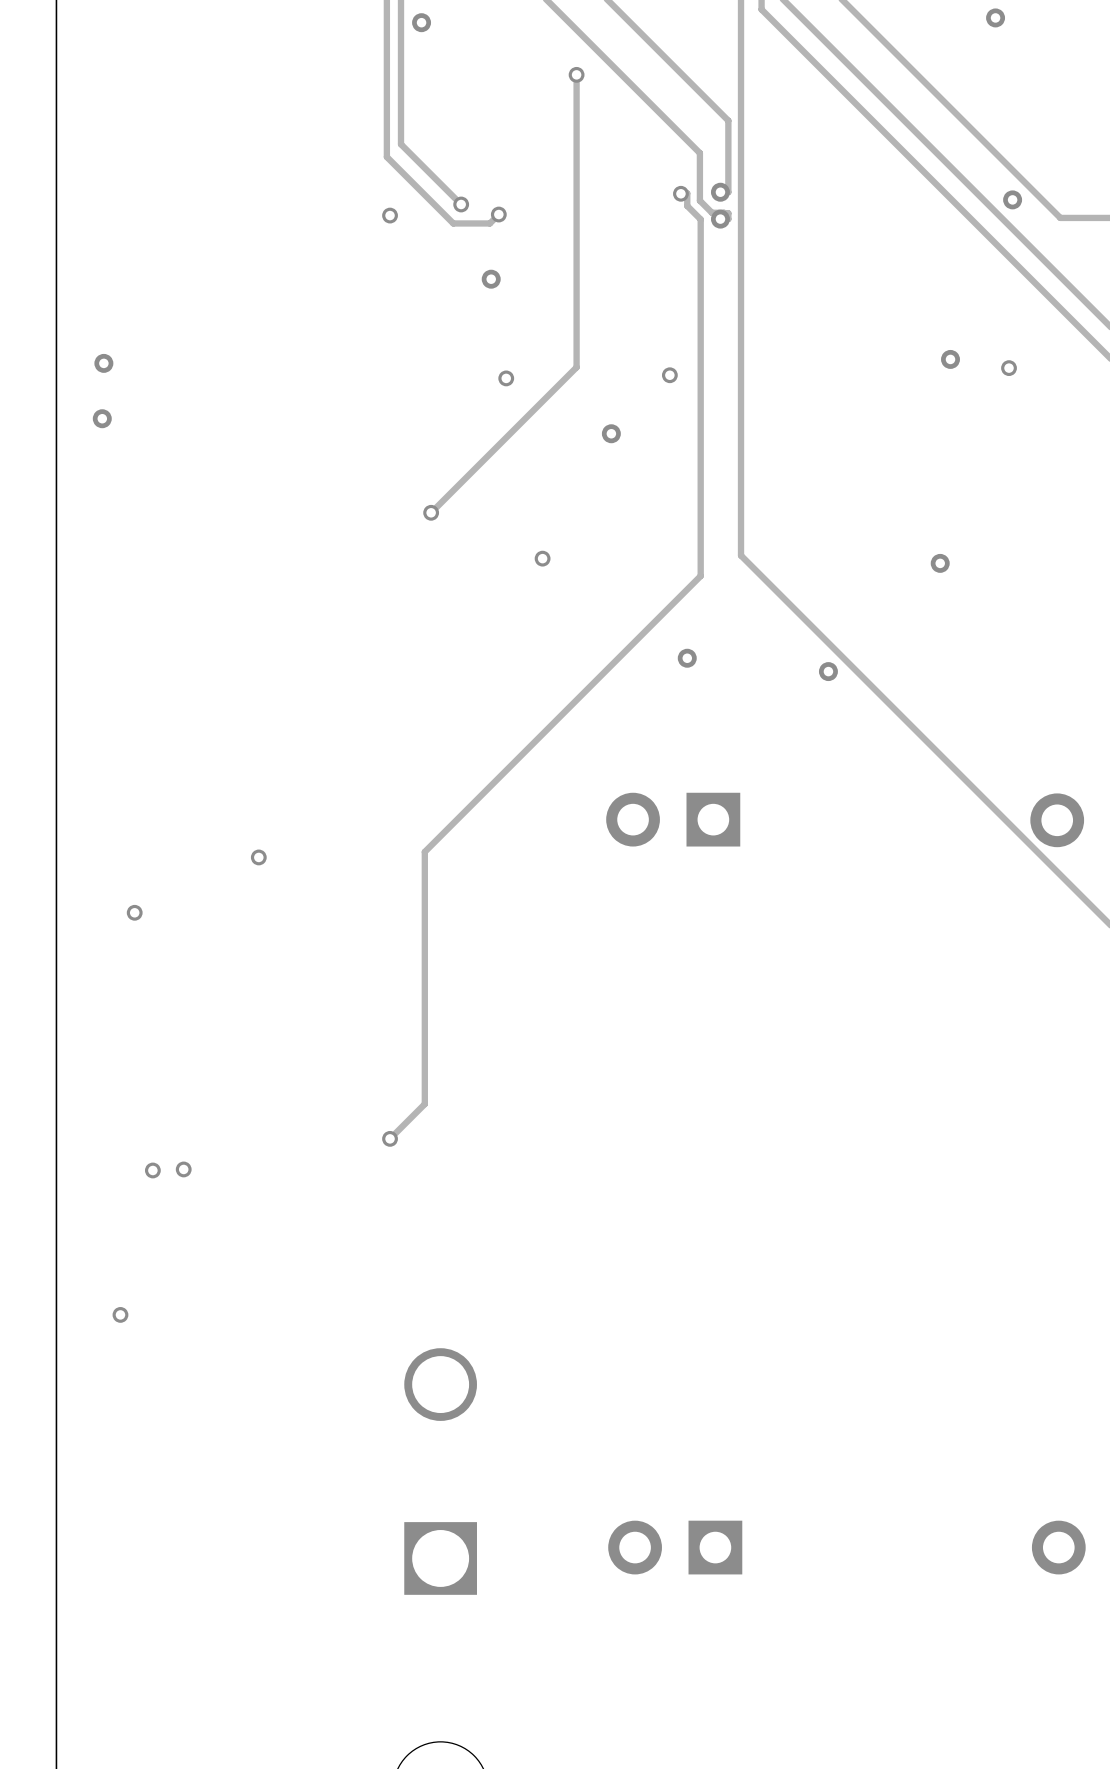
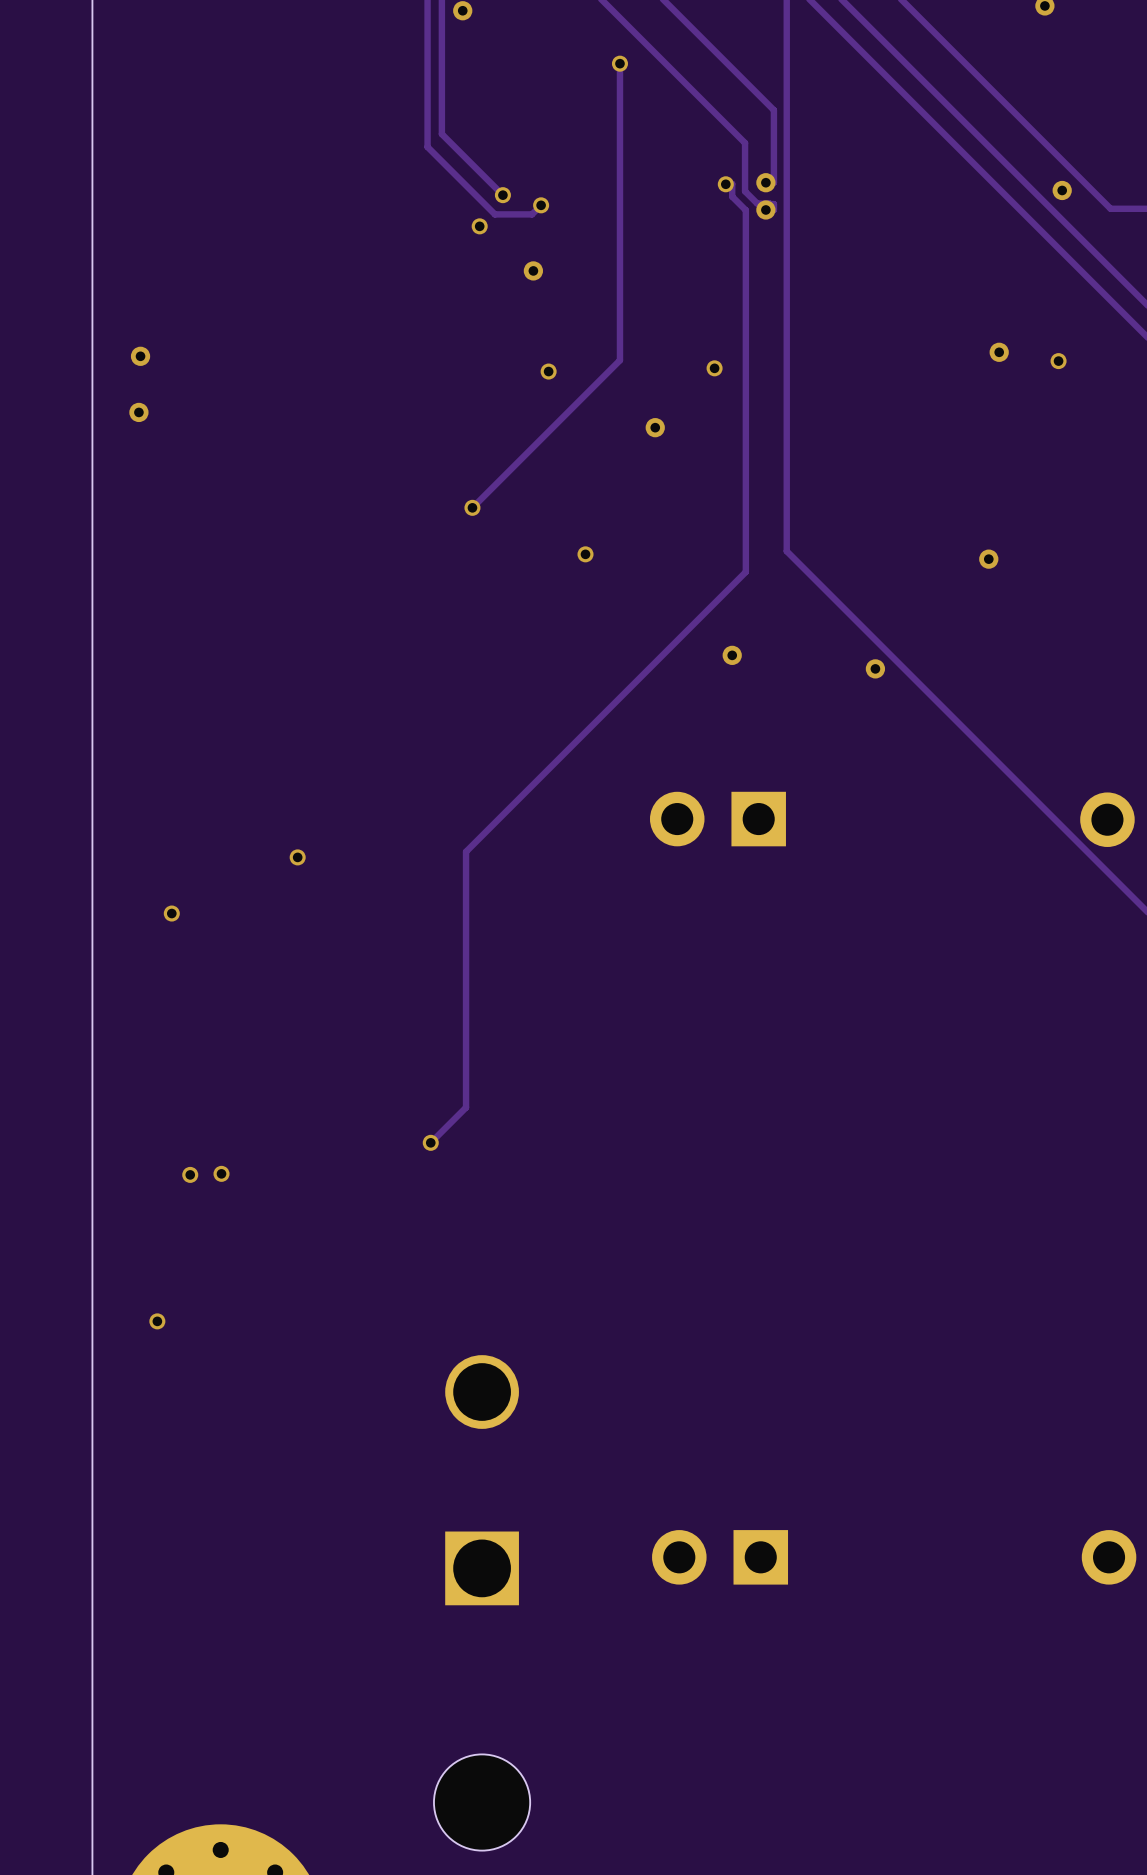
via position: (390, 215) -> (479, 226)

